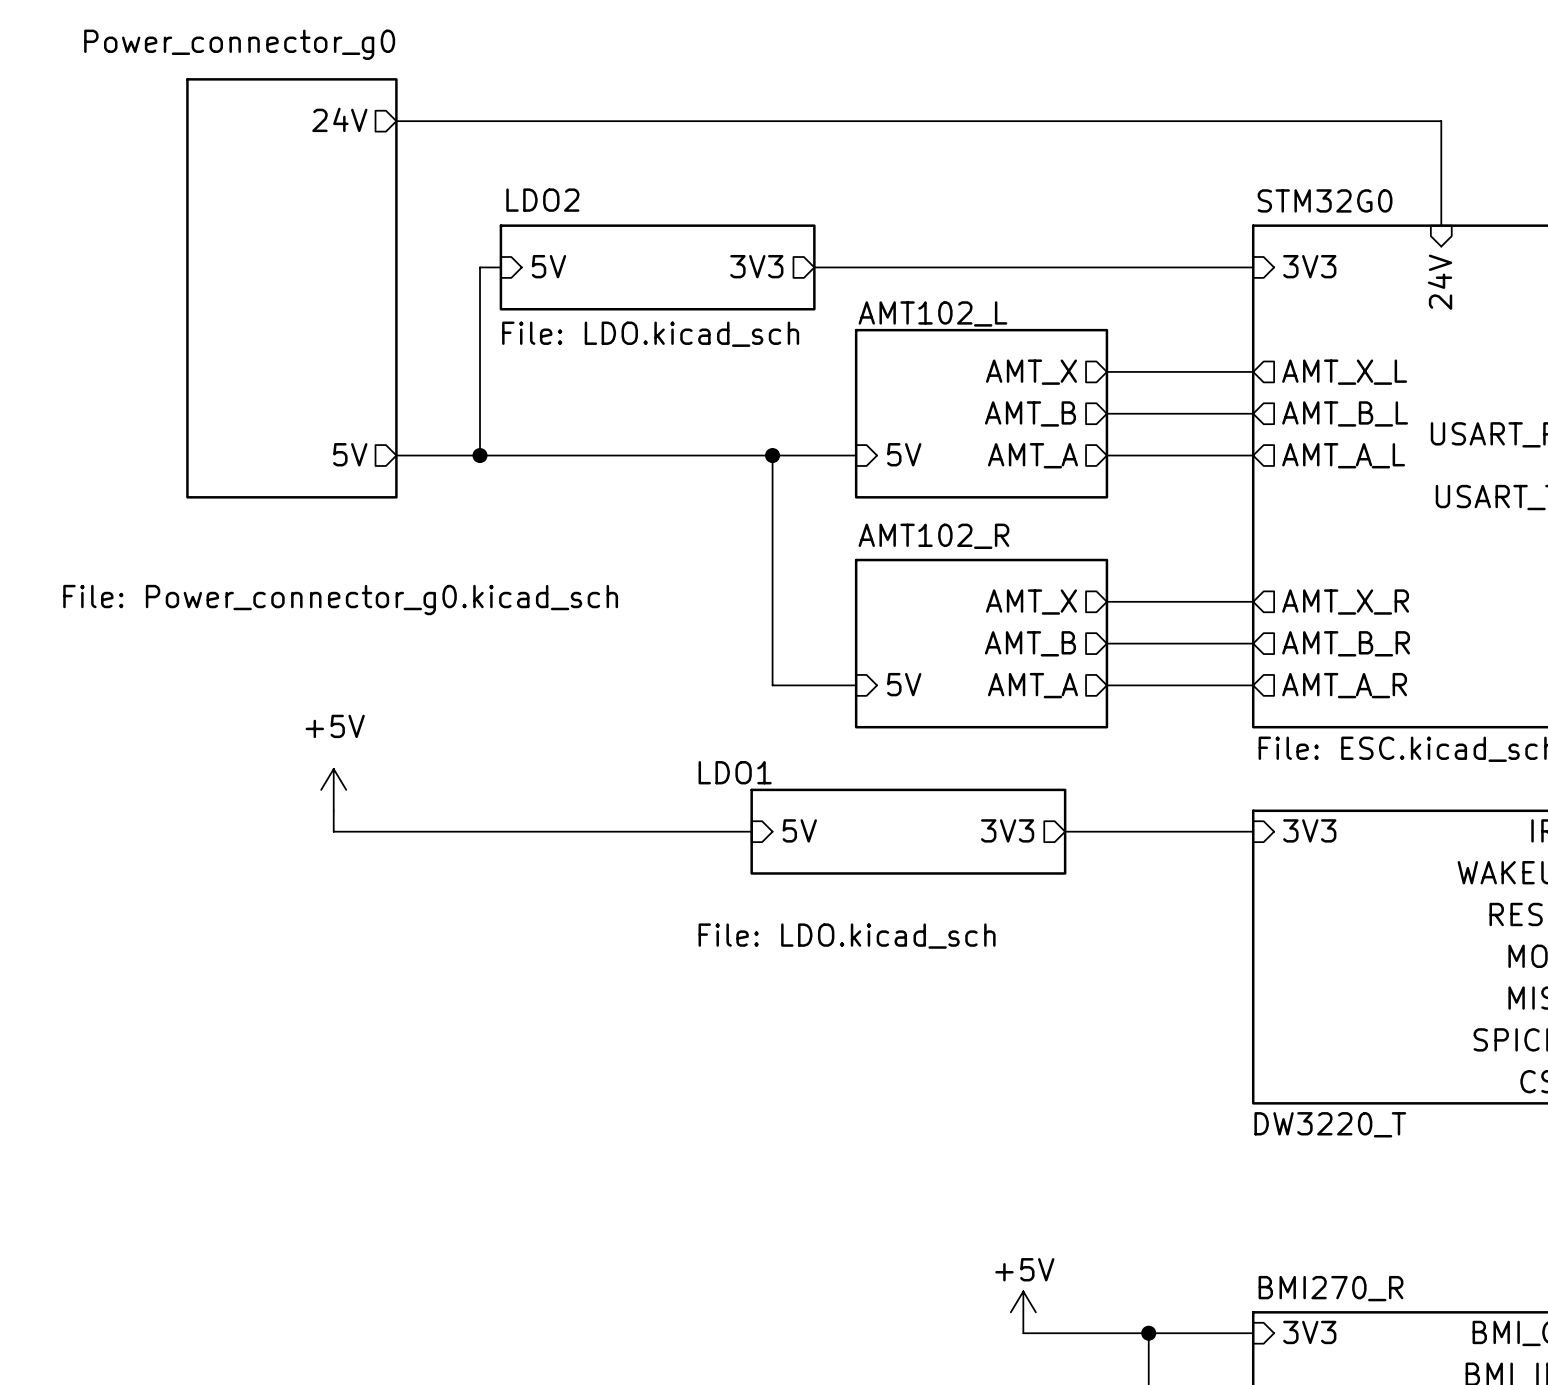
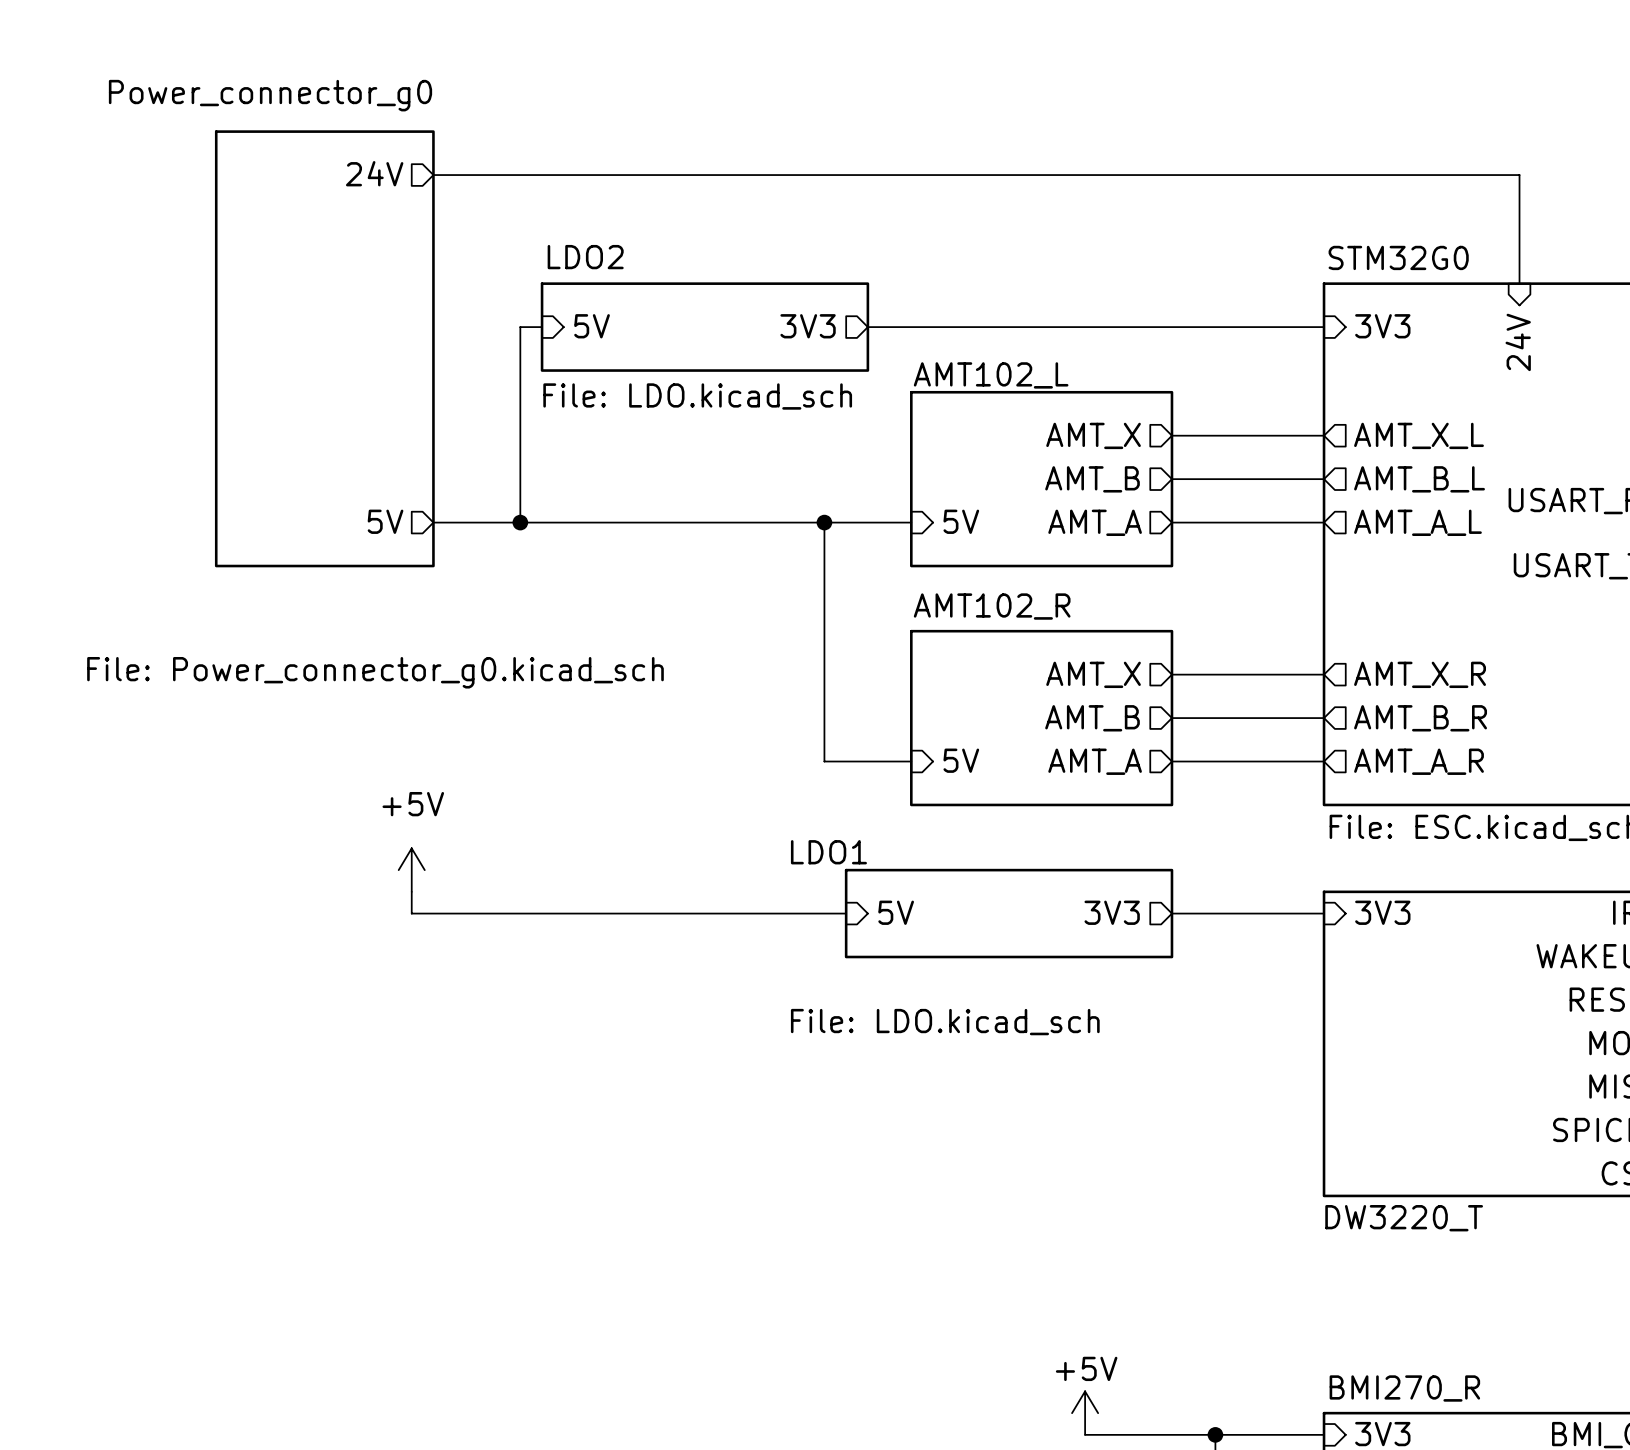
power symbol position: +5V (333, 789) -> +5V (411, 870)
wire: (333, 810) (333, 831) (375, 831) -> (411, 891) (411, 913)
sheet pin position: 5V (799, 830) -> 5V (896, 912)
sheet pin position: 3V3 (1007, 830) -> 3V3 (1112, 912)
sheet LDO1 position: (908, 831) -> (1009, 913)
wire: (1065, 831) (1106, 831) -> (802, 913) (846, 913)

